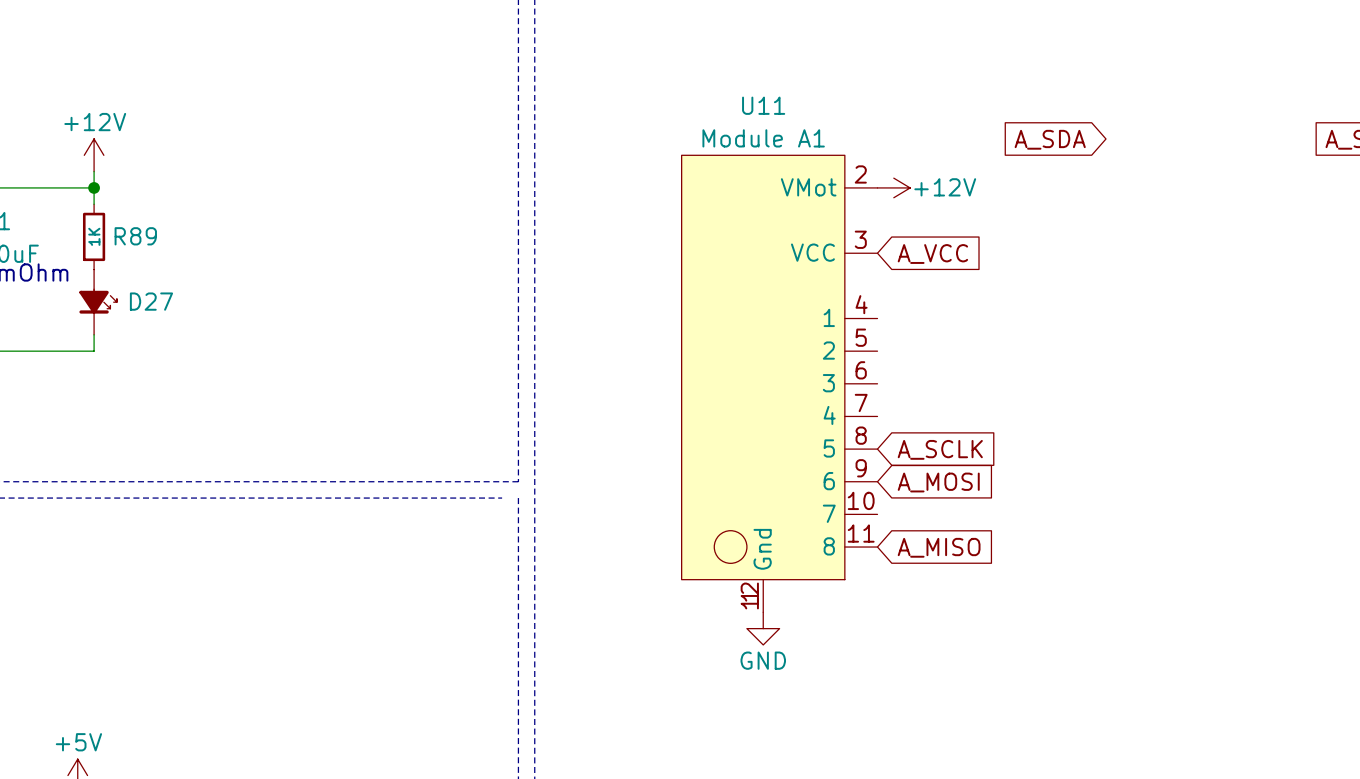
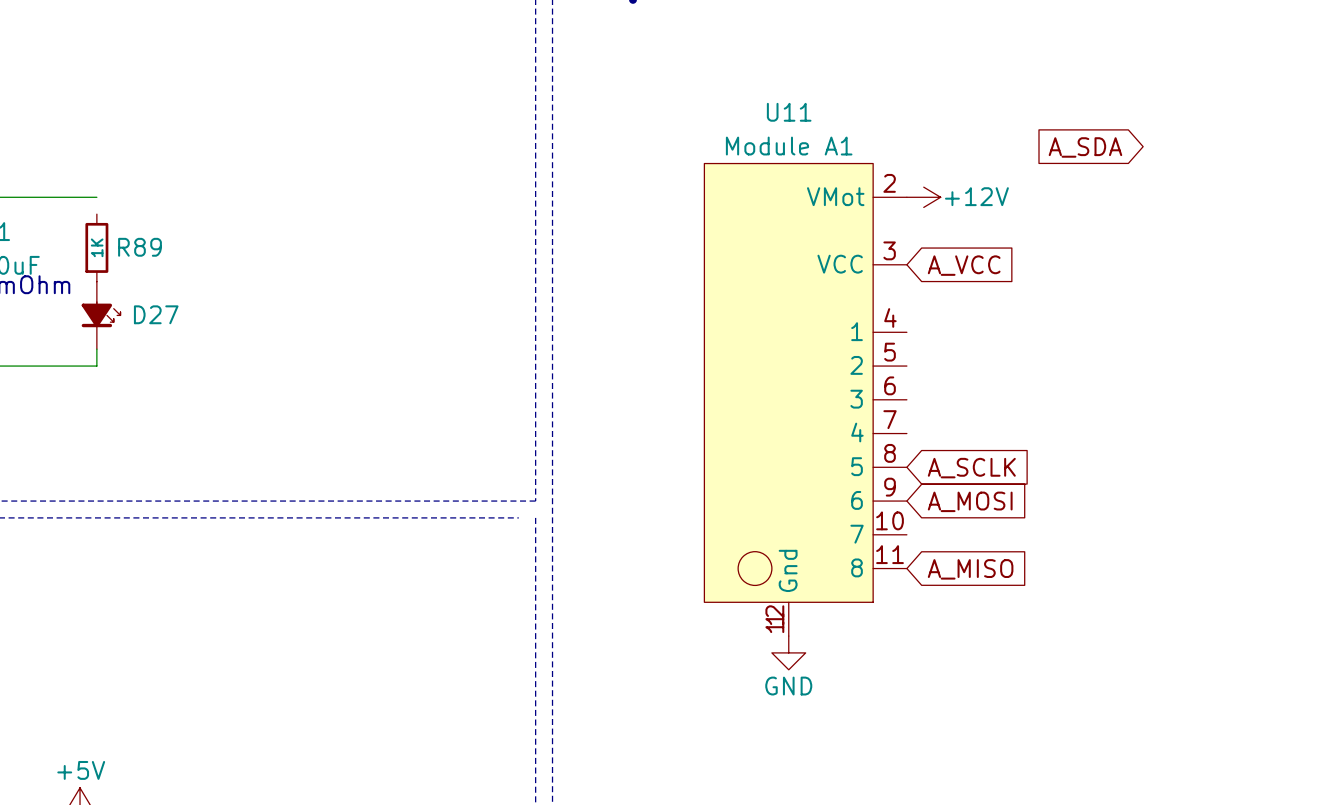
power symbol: +12V (94, 155) -> none
wire: (94, 171) (94, 204) -> none
junction: (94, 187) -> none

